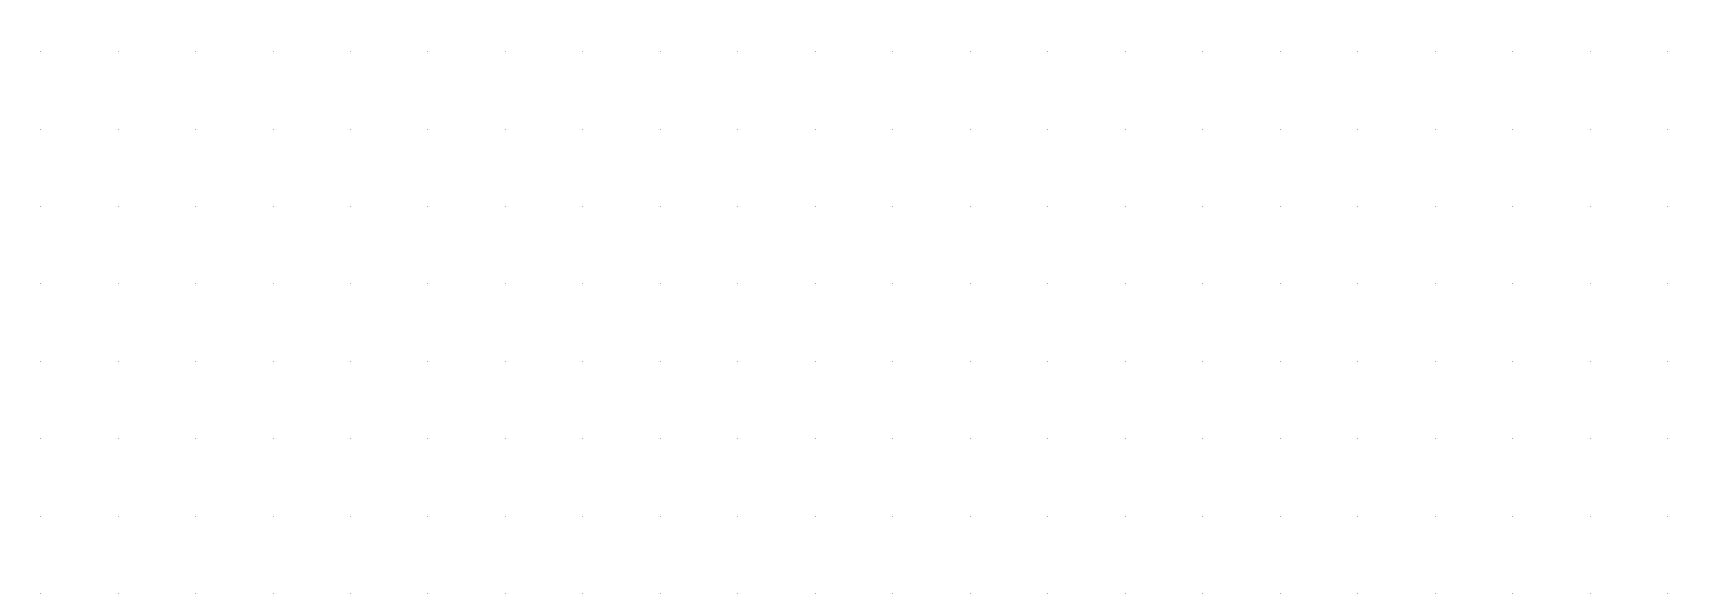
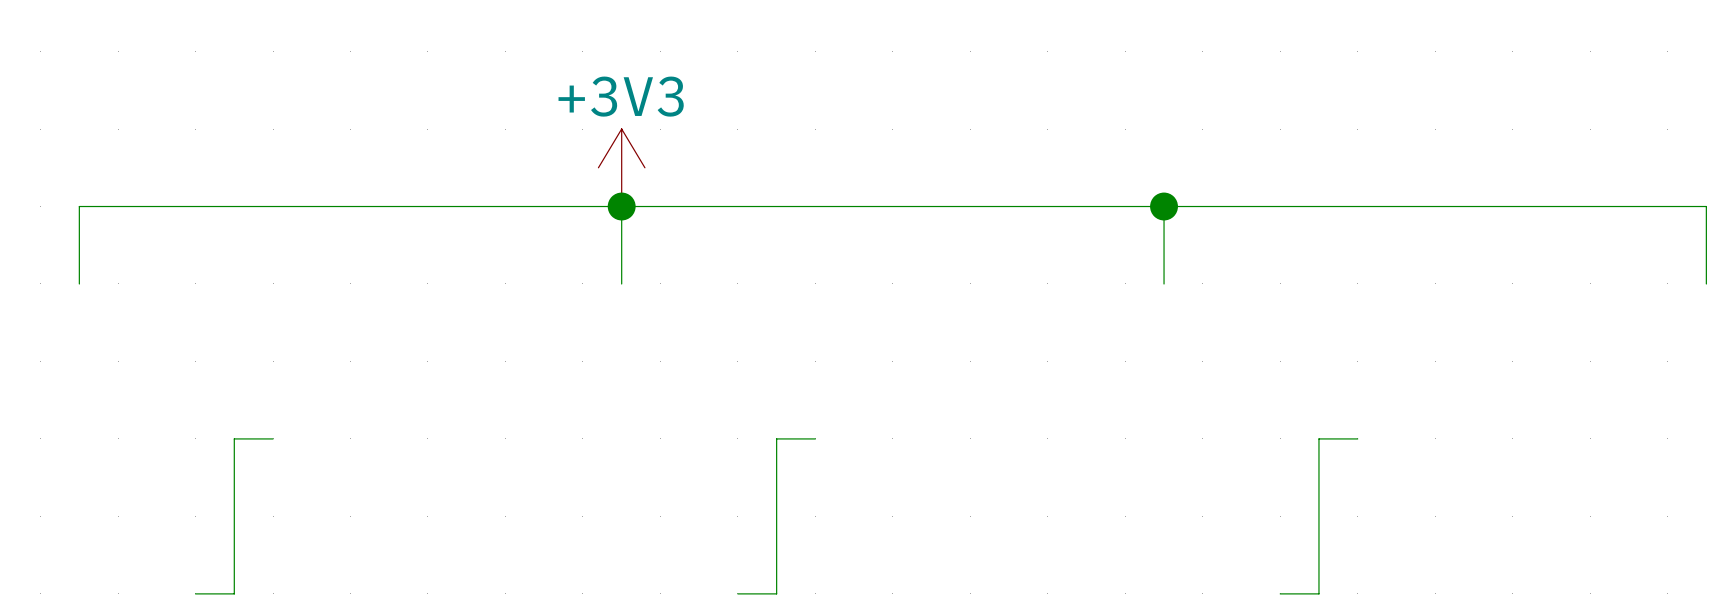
power symbol: none -> +3V3 (621, 167)
wire: none -> (621, 206) (621, 283)
junction: none -> (621, 206)
wire: none -> (1164, 206) (1164, 283)
junction: none -> (1164, 206)
wire: none -> (79, 283) (79, 206) (1706, 206) (1706, 283)
wire: none -> (273, 438) (234, 438) (234, 593) (195, 593)
wire: none -> (815, 438) (776, 438) (776, 593) (737, 593)
wire: none -> (1357, 438) (1318, 438) (1318, 593) (1280, 593)

